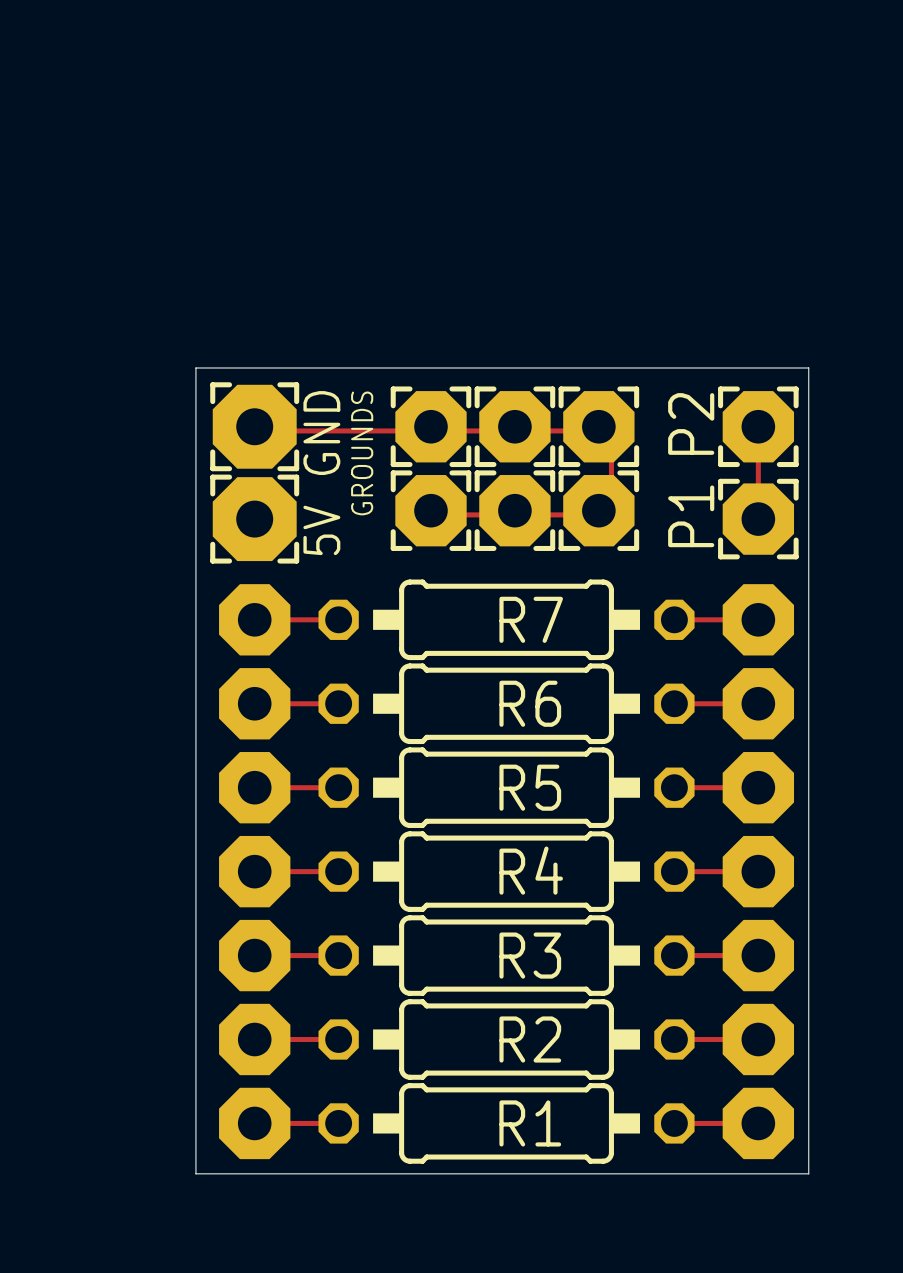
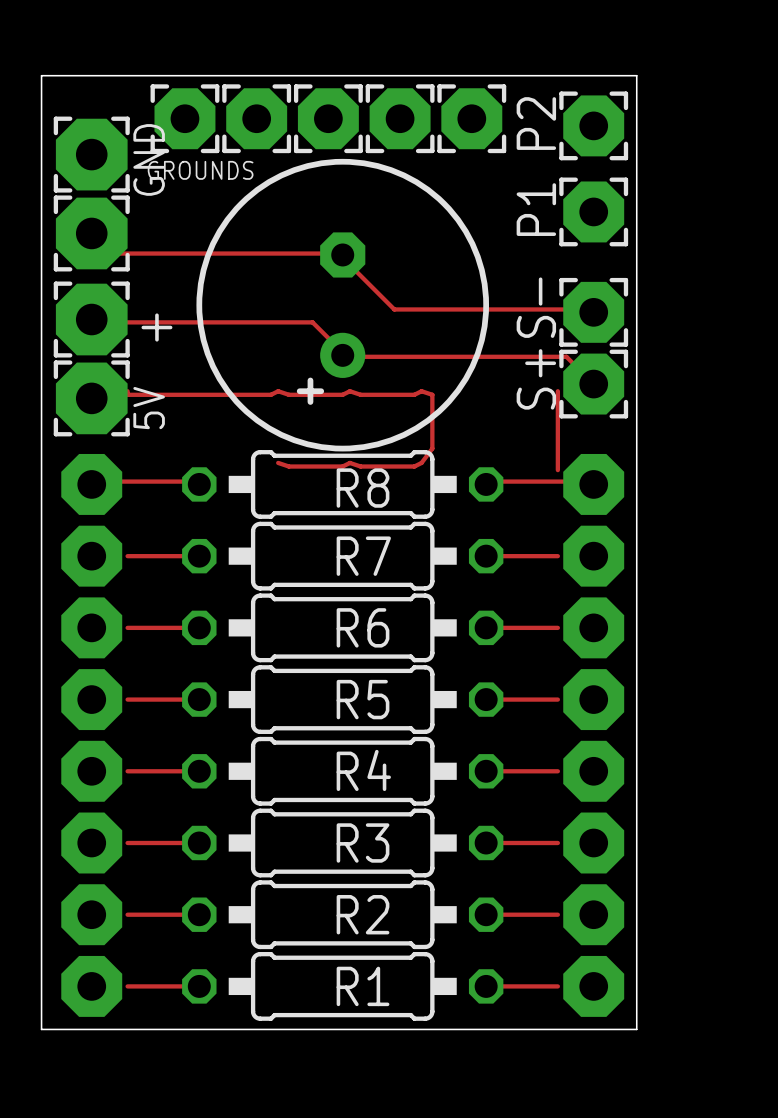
part: none -> (256, 118)
part: none -> (328, 118)
part: none -> (400, 118)
part: none -> (471, 118)
track: none -> (91, 233) (110, 253) (342, 253) (342, 257) (394, 309) (592, 309) (593, 312)
part: none -> (91, 233)
part: none -> (342, 305)
S-: none -> (593, 312)
track: none -> (91, 319) (93, 322) (312, 322) (342, 352) (342, 356) (566, 356) (593, 384)
part: none -> (91, 319)
S+: none -> (593, 384)
GND position: (254, 426) -> (91, 154)
part: (430, 426) -> none
part: (514, 426) -> none
part: (598, 426) -> none
P2 position: (758, 426) -> (593, 125)
GROUNDS name rotation: 0° (362, 453) -> 90° clockwise (200, 170)
GROUNDS name position: GROUNDS (362, 453) -> GROUNDS (200, 170)
GROUNDS position: (430, 510) -> (184, 118)
part: (514, 510) -> none
part: (598, 510) -> none
5V position: (254, 519) -> (91, 398)
P1 position: (758, 519) -> (593, 211)
track: none -> (91, 484) (93, 481) (196, 481) (199, 484)
part: none -> (91, 484)
R8: none -> (342, 484)
track: none -> (486, 484) (489, 481) (592, 481) (593, 484)
part: none -> (593, 484)
part position: (254, 619) -> (91, 556)
part position: (758, 619) -> (593, 556)
part position: (254, 703) -> (91, 627)
part position: (758, 703) -> (593, 627)
part position: (254, 787) -> (91, 699)
part position: (758, 787) -> (593, 699)
part position: (254, 871) -> (91, 771)
part position: (758, 871) -> (593, 771)
part position: (254, 955) -> (91, 843)
part position: (758, 955) -> (593, 843)
part position: (254, 1039) -> (91, 914)
part position: (758, 1039) -> (593, 914)
part position: (254, 1123) -> (91, 986)
part position: (758, 1123) -> (593, 986)
board edge: (195, 1173) (195, 367) (808, 367) (808, 1173) -> (77, 1029) (41, 1029) (41, 75) (636, 75) (636, 1029) (600, 1029)

